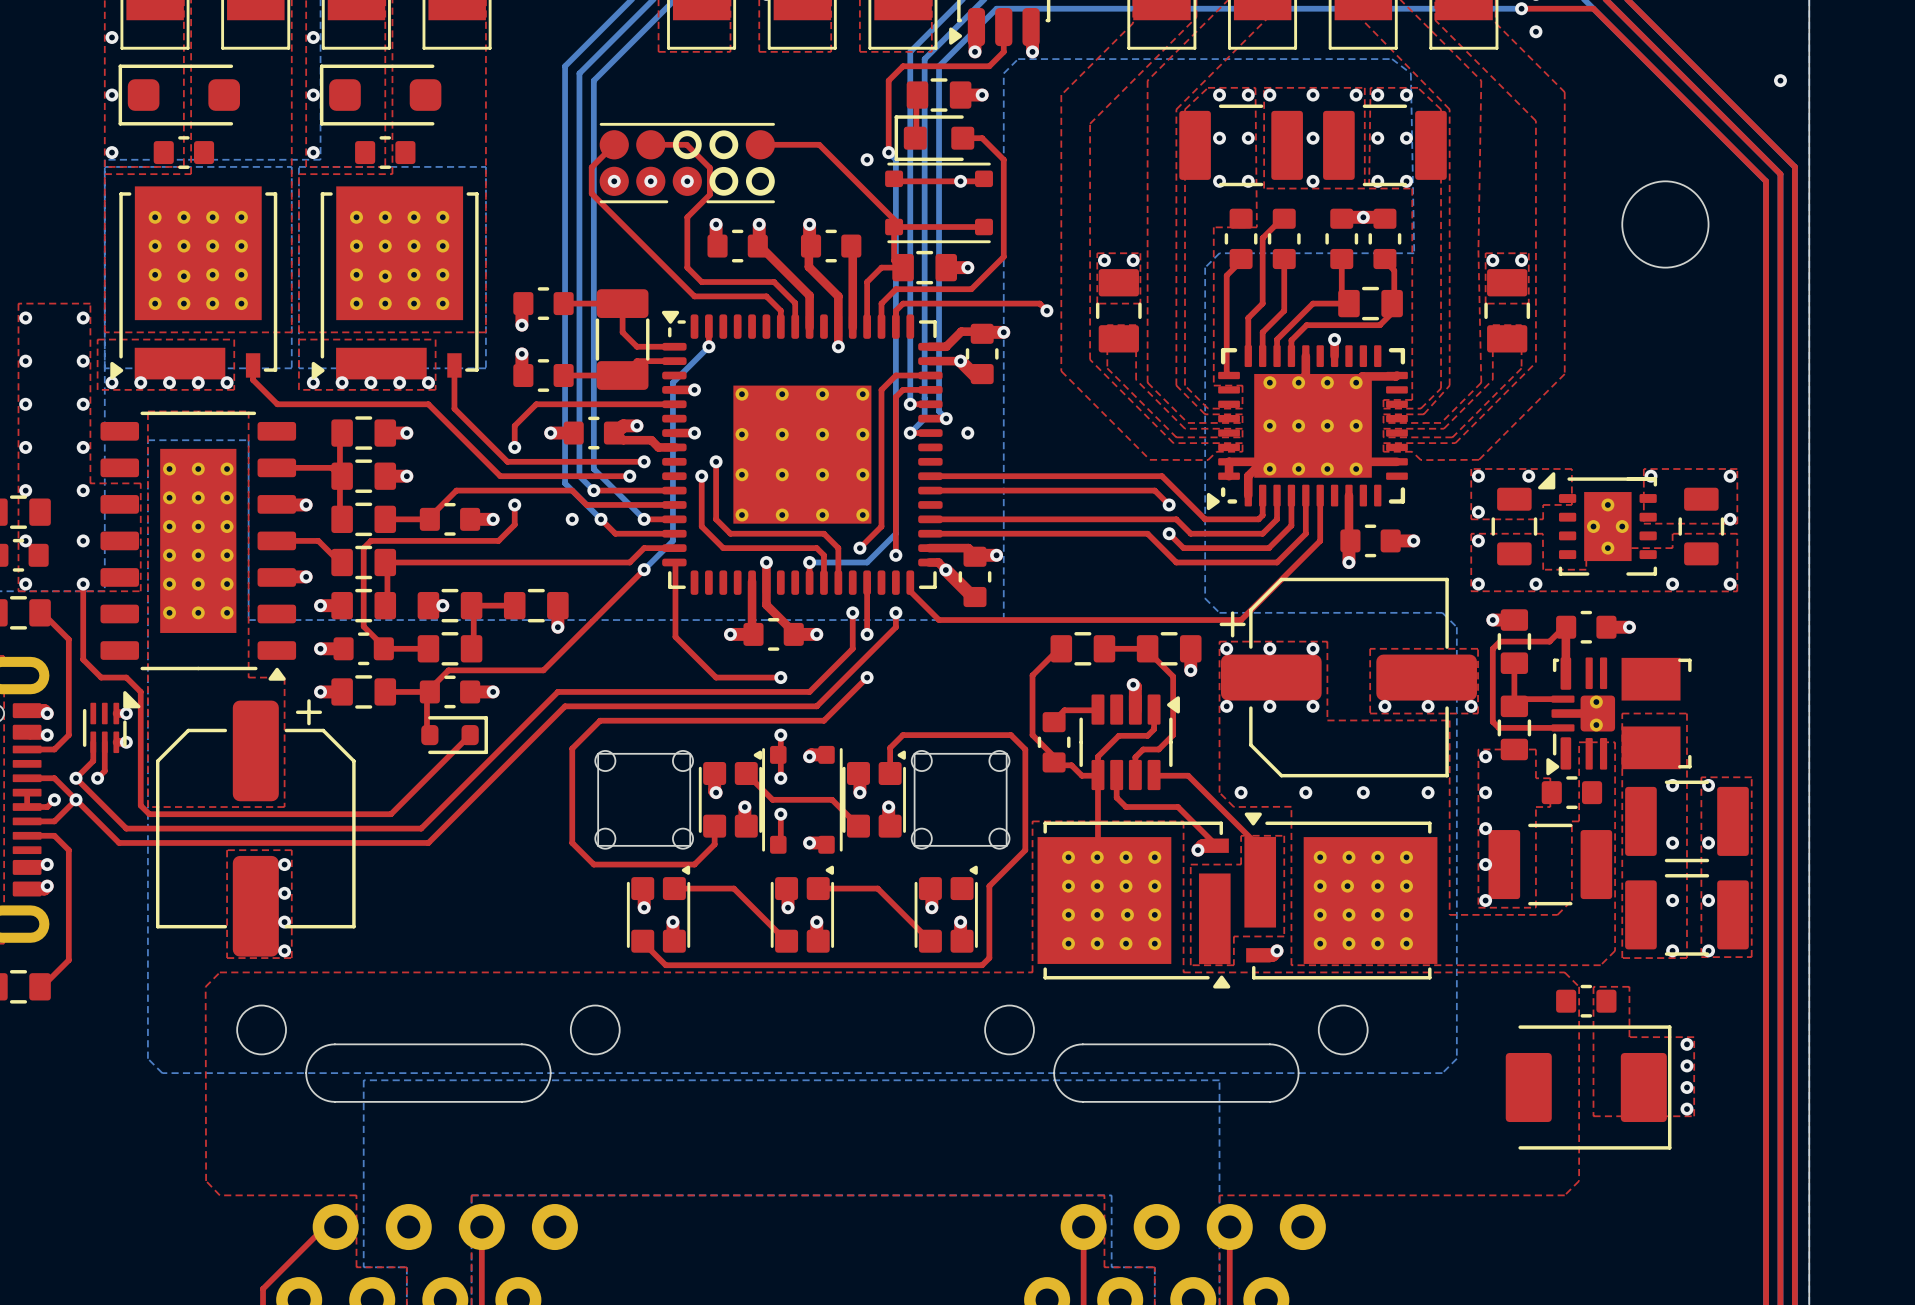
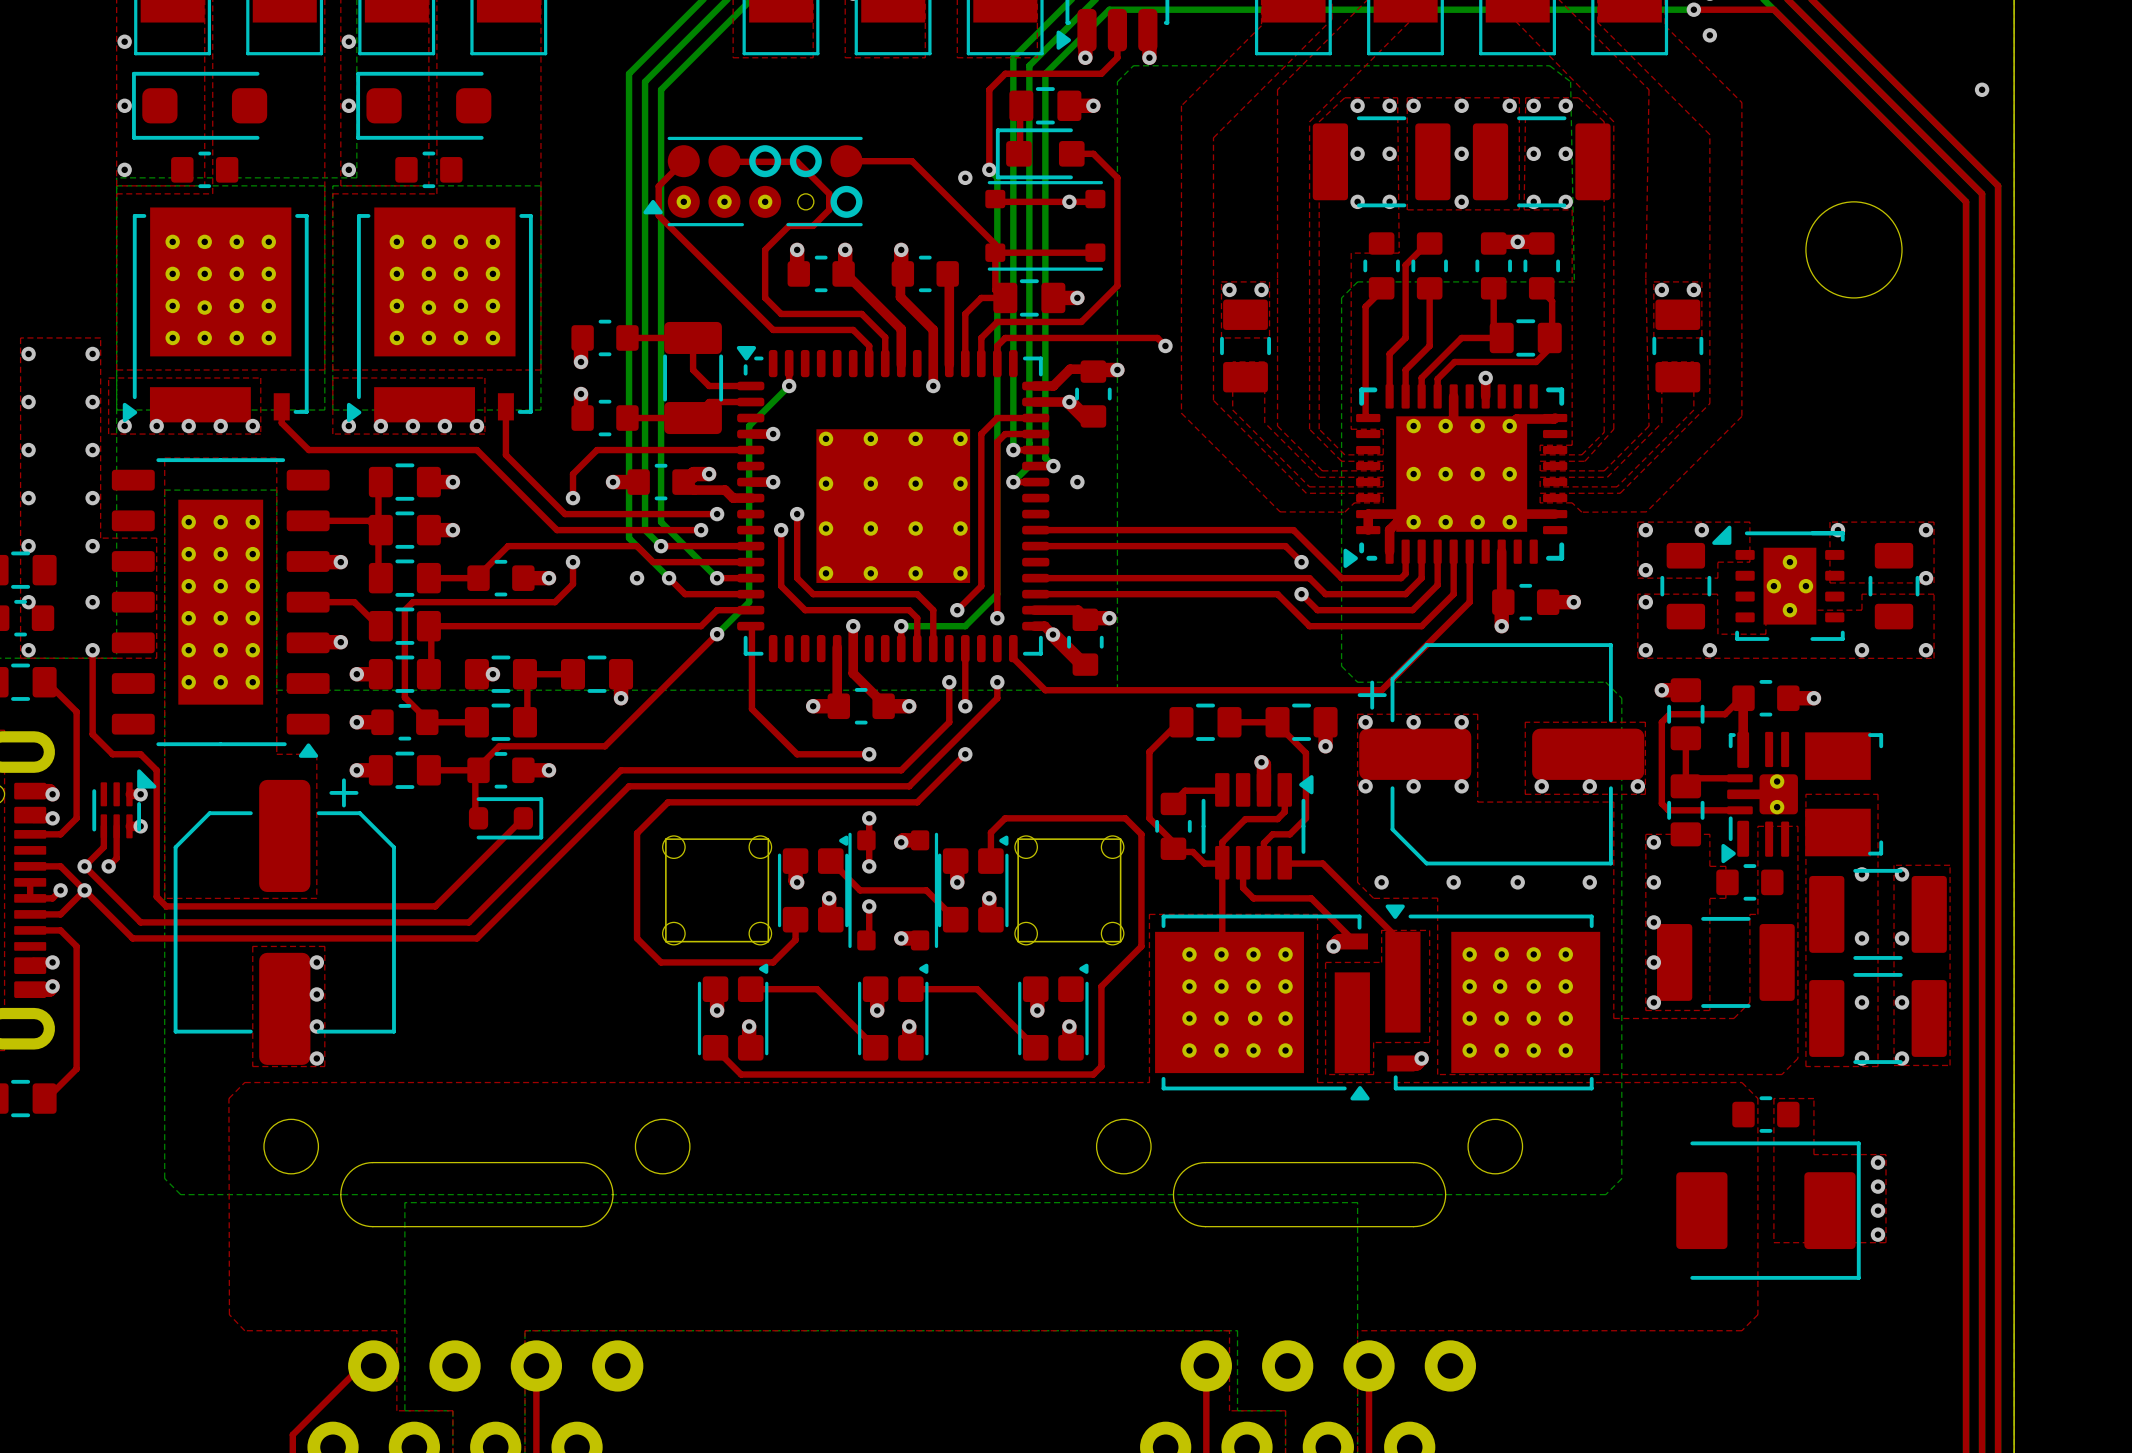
part footprint: [599, 122, 776, 204] -> [643, 136, 863, 227]
top track: (650, 144) (686, 144) (709, 167) (709, 194) (687, 217) (687, 224) -> (724, 161) (797, 161) (829, 193) (829, 209) (813, 225) (789, 225) (765, 249)
via: (614, 181) -> none
via: (650, 181) -> none
via: (687, 181) -> none

